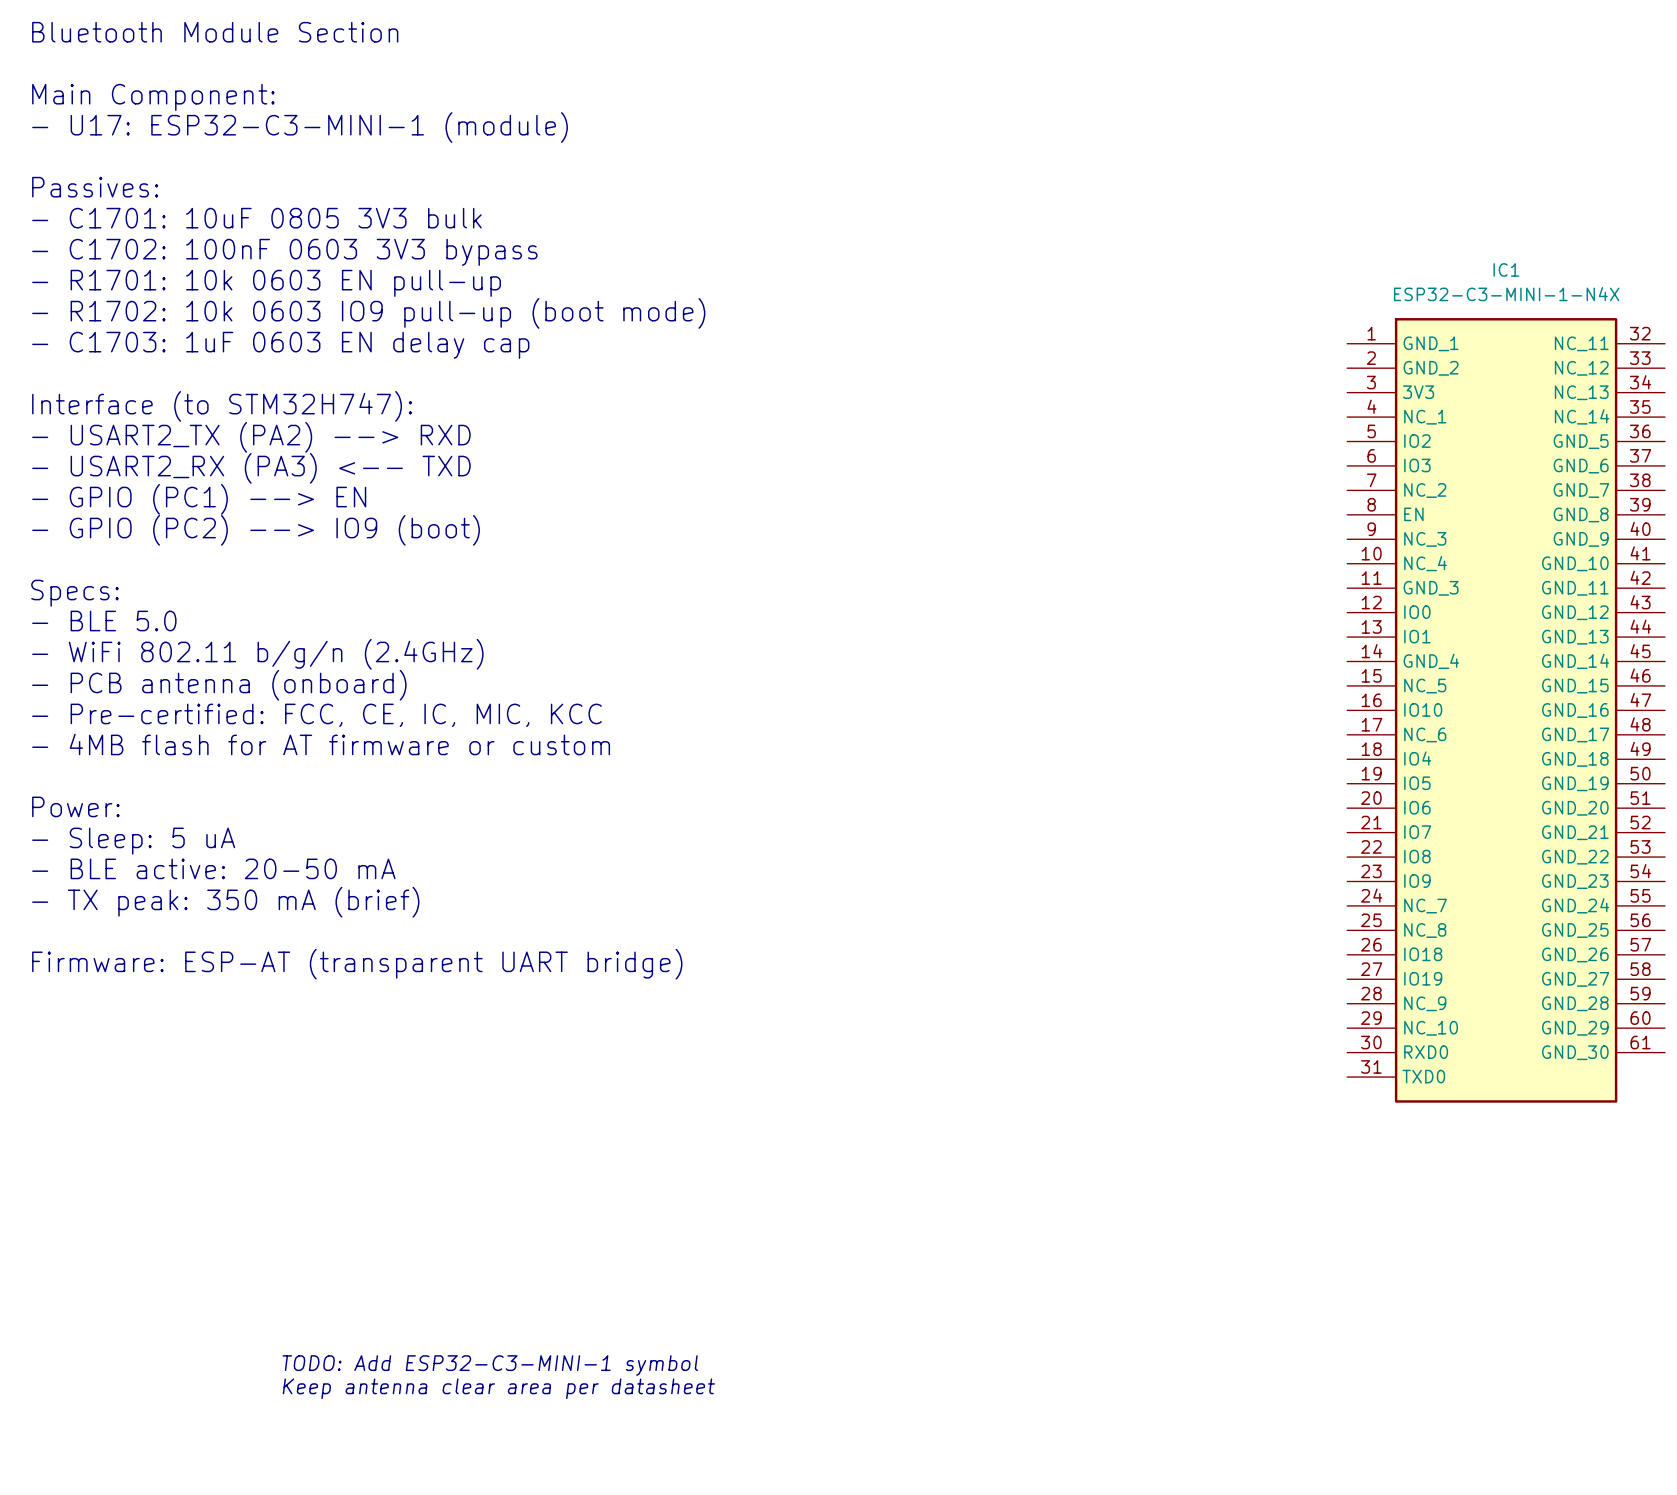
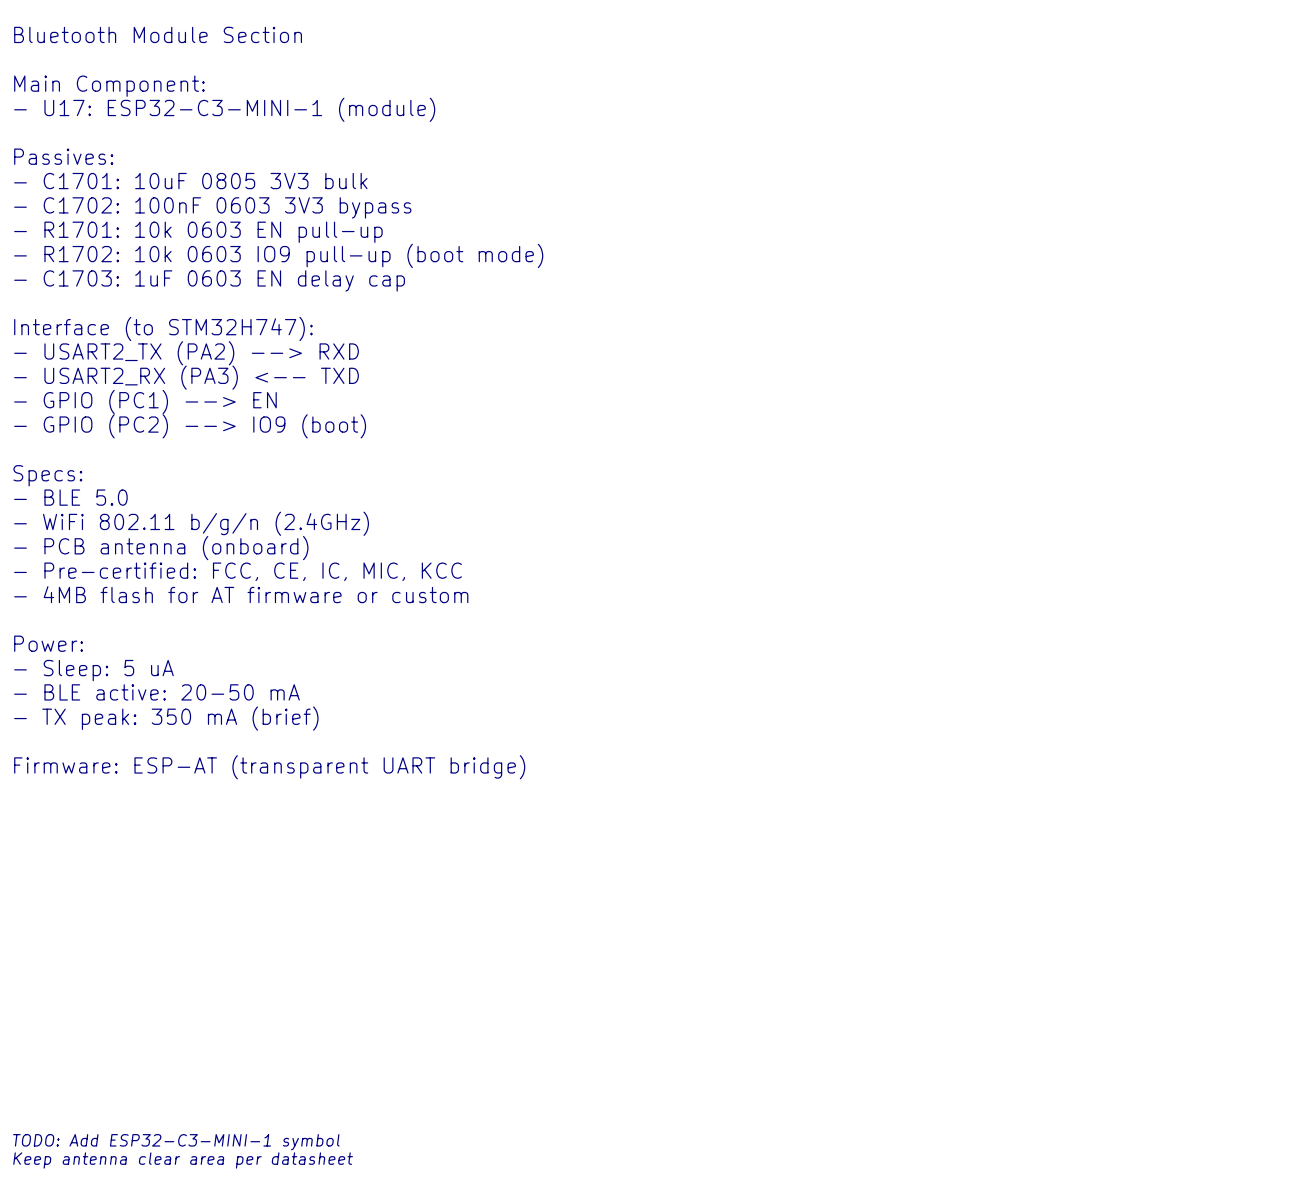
IC1: ESP32-C3-MINI-1-N4X (1506, 710) -> none
text: TODO: Add ESP32-C3-MINI-1 symbol (490, 1365) -> none
text: Keep antenna clear area per datasheet (498, 1388) -> none
text: none -> TODO: Add ESP32-C3-MINI-1 symbol (176, 1142)
text: none -> Keep antenna clear area per datasheet (183, 1160)

